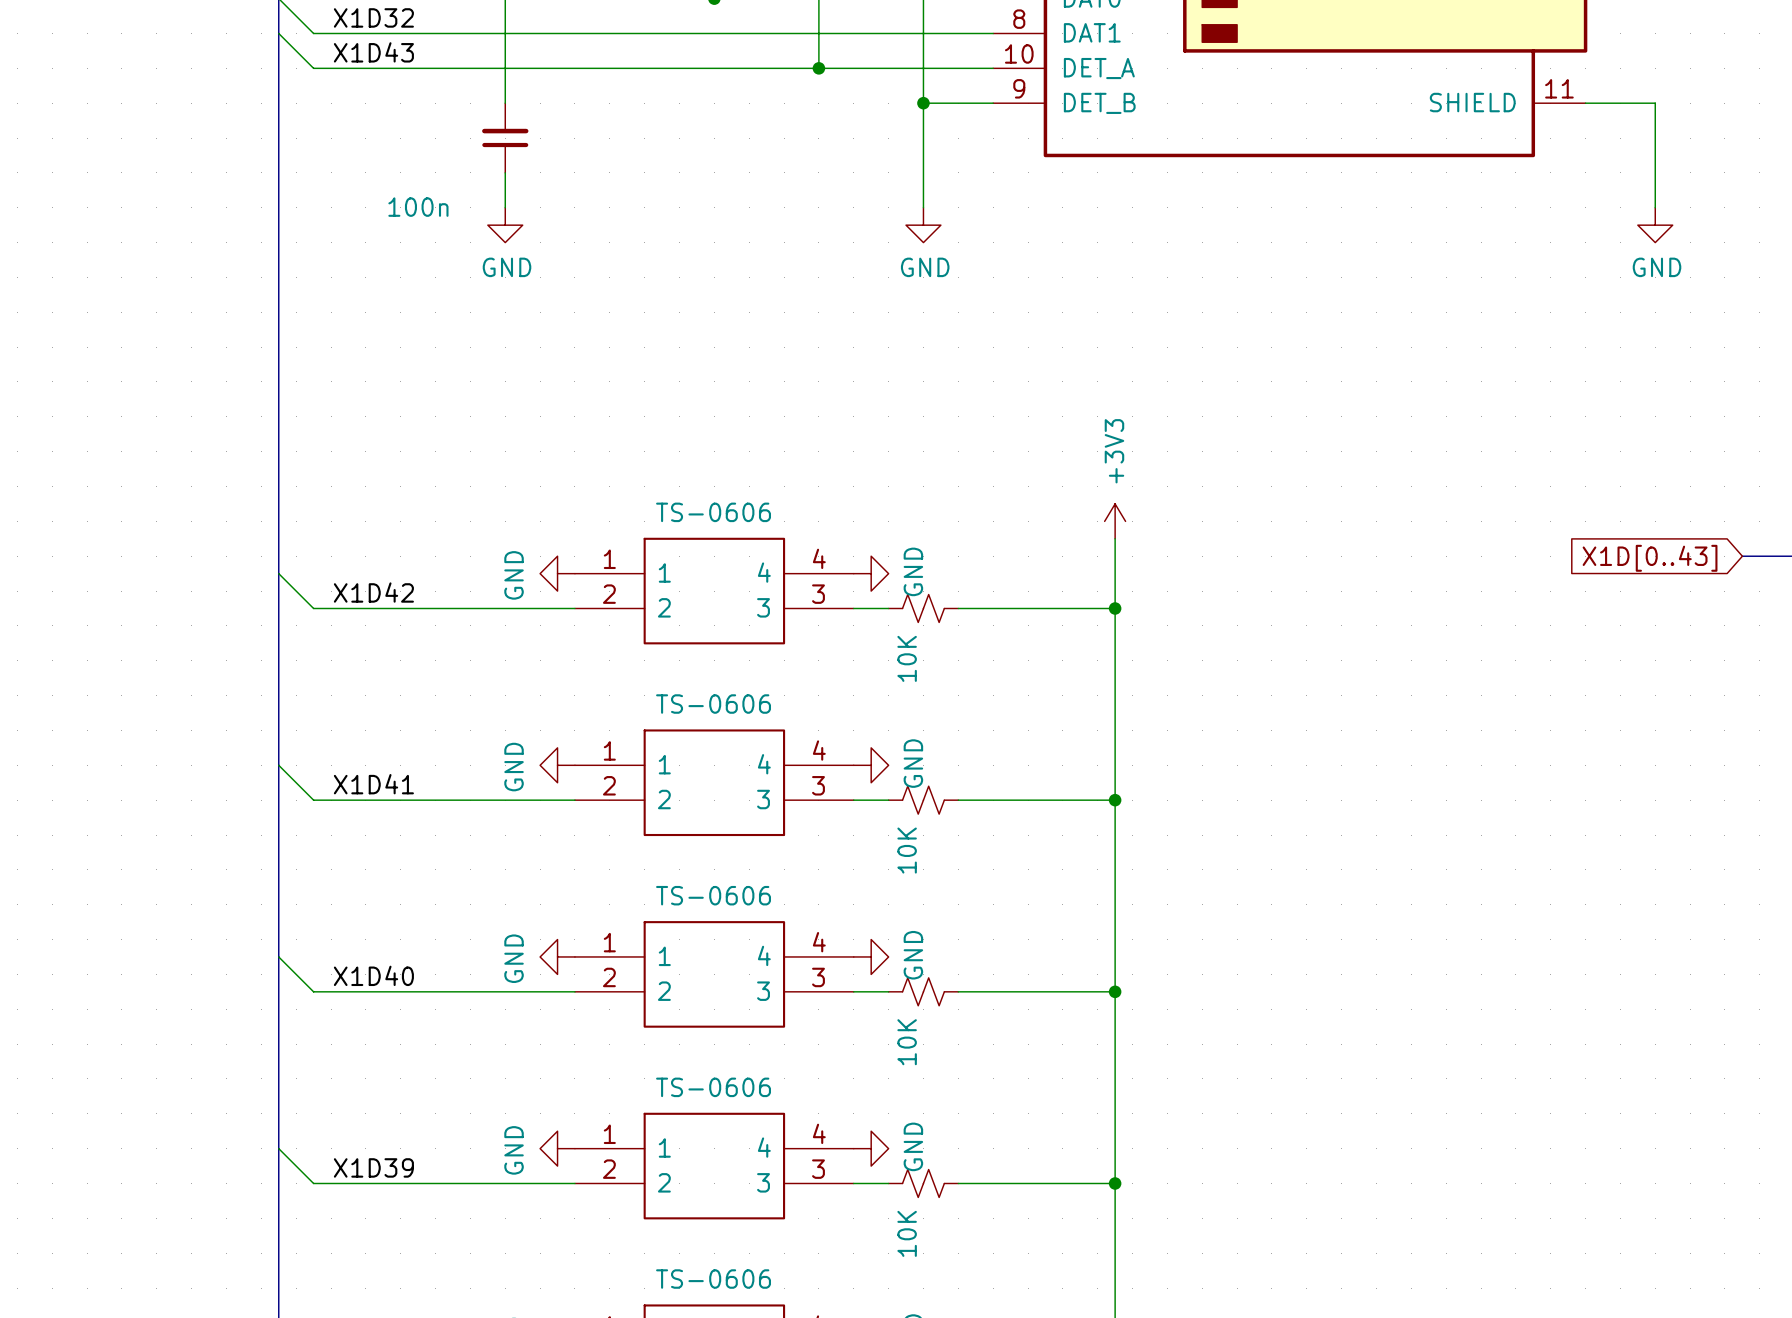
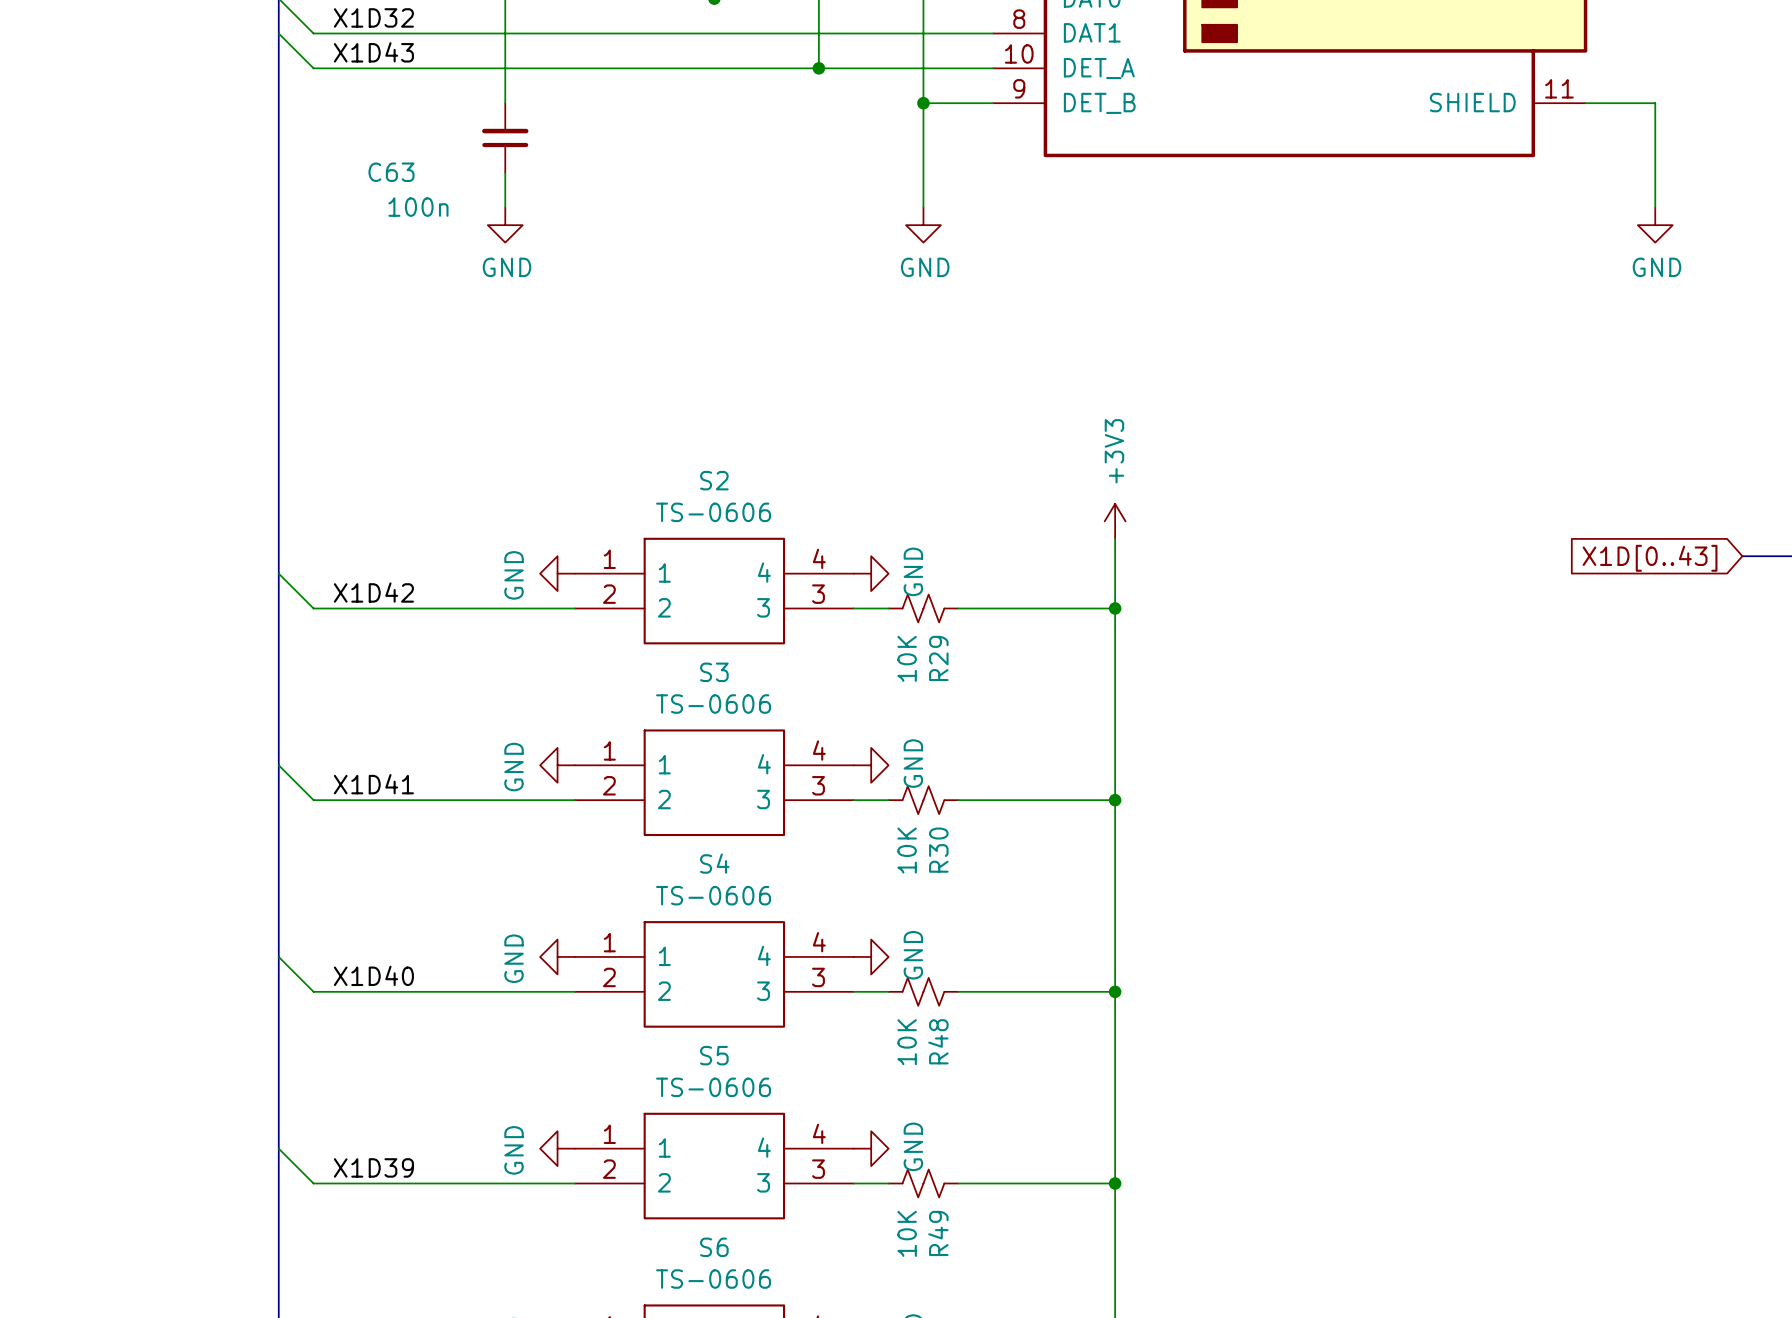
C63 name: none -> C63 (391, 172)
S2 name: none -> S2 (714, 480)
R29 name: none -> R29 (938, 658)
S3 name: none -> S3 (714, 672)
R30 name: none -> R30 (938, 850)
S4 name: none -> S4 (714, 863)
R48 name: none -> R48 (938, 1041)
S5 name: none -> S5 (714, 1055)
R49 name: none -> R49 (938, 1233)
S6 name: none -> S6 (714, 1247)

